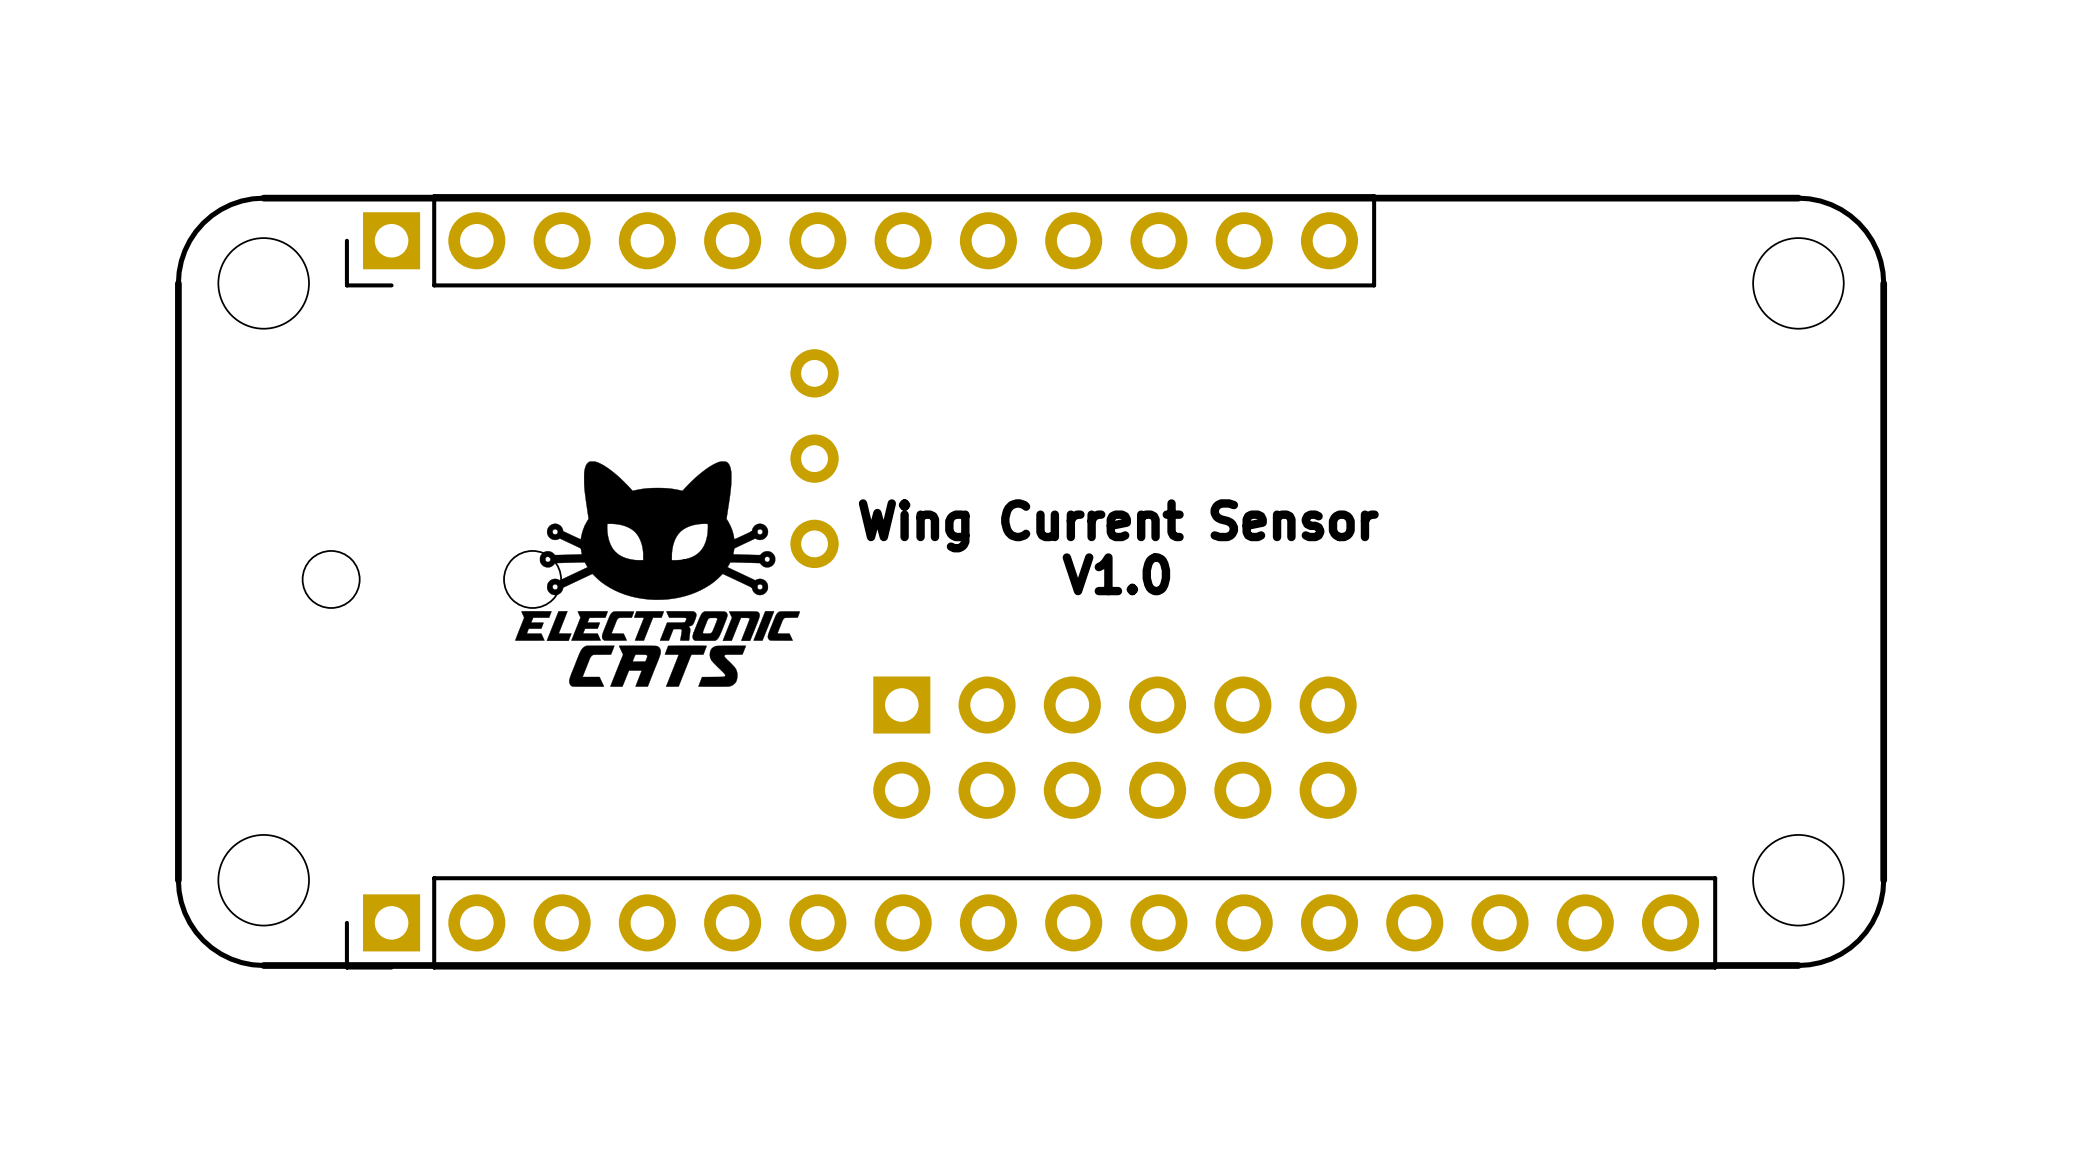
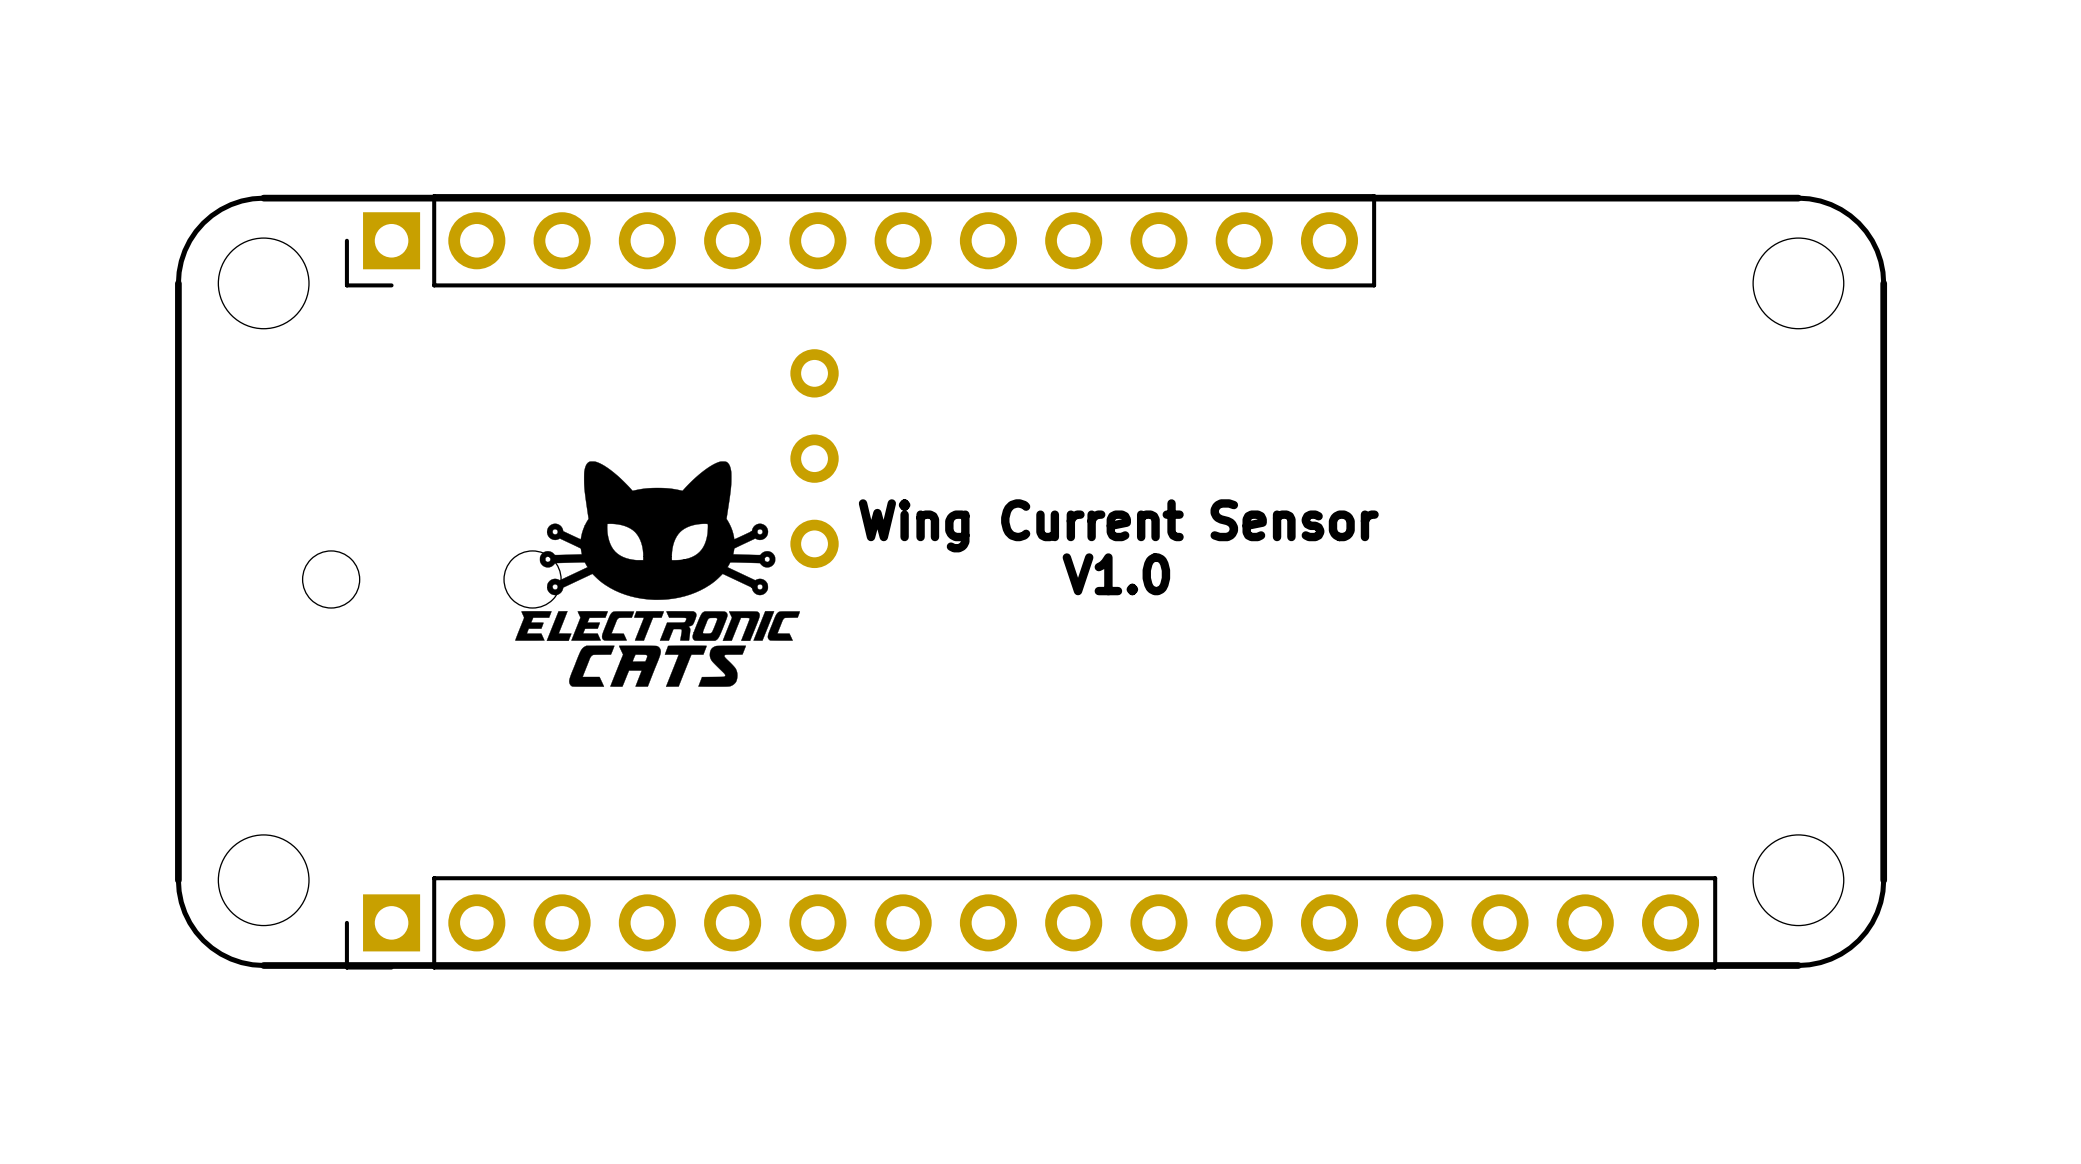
part: (1114, 747) -> none

